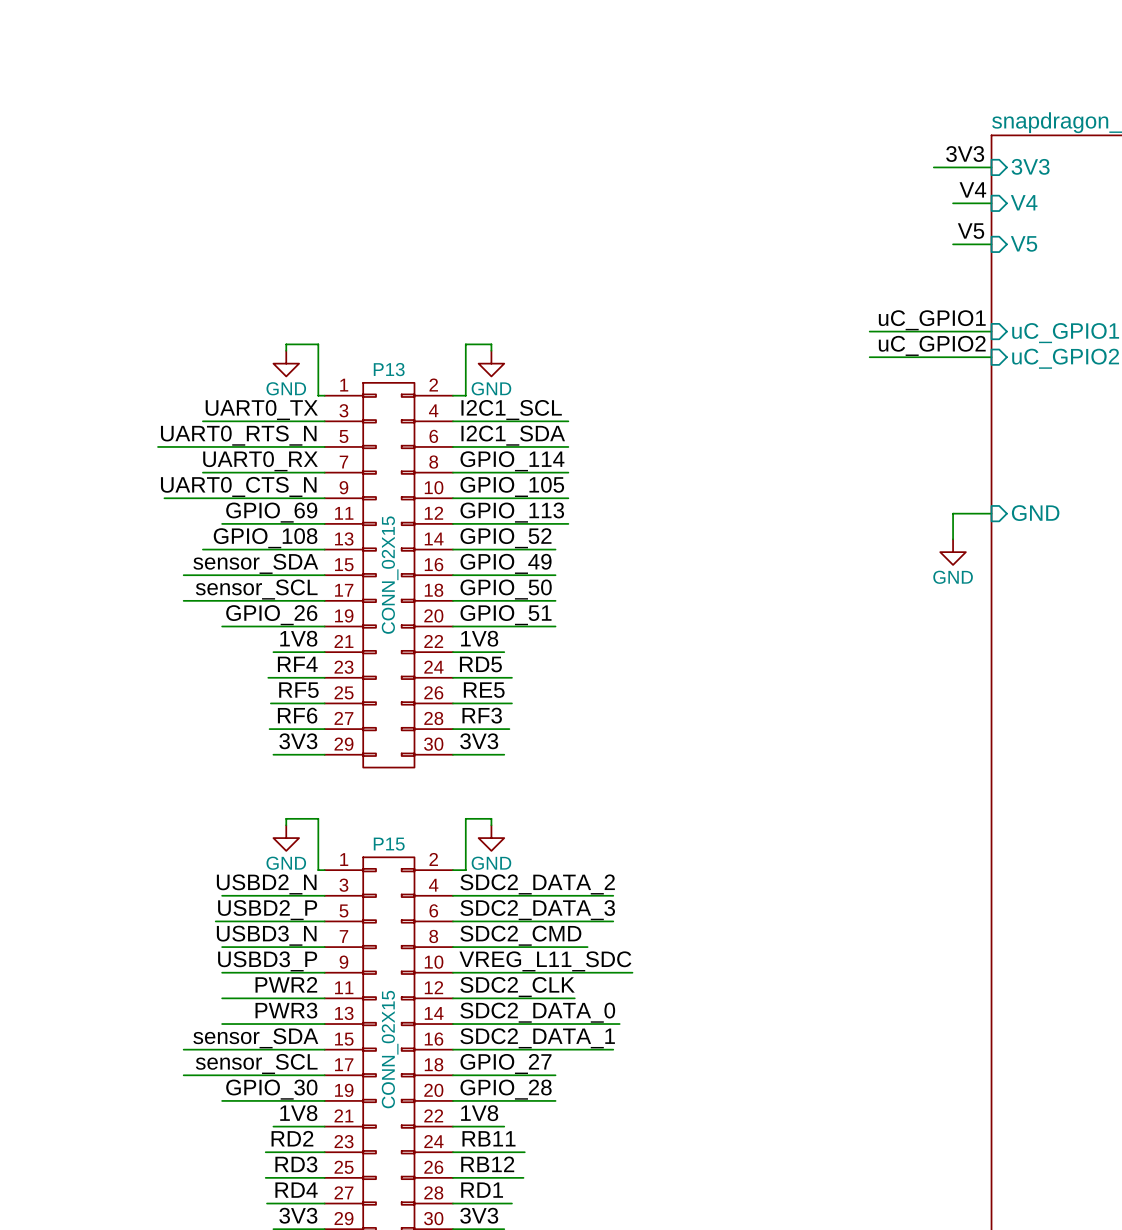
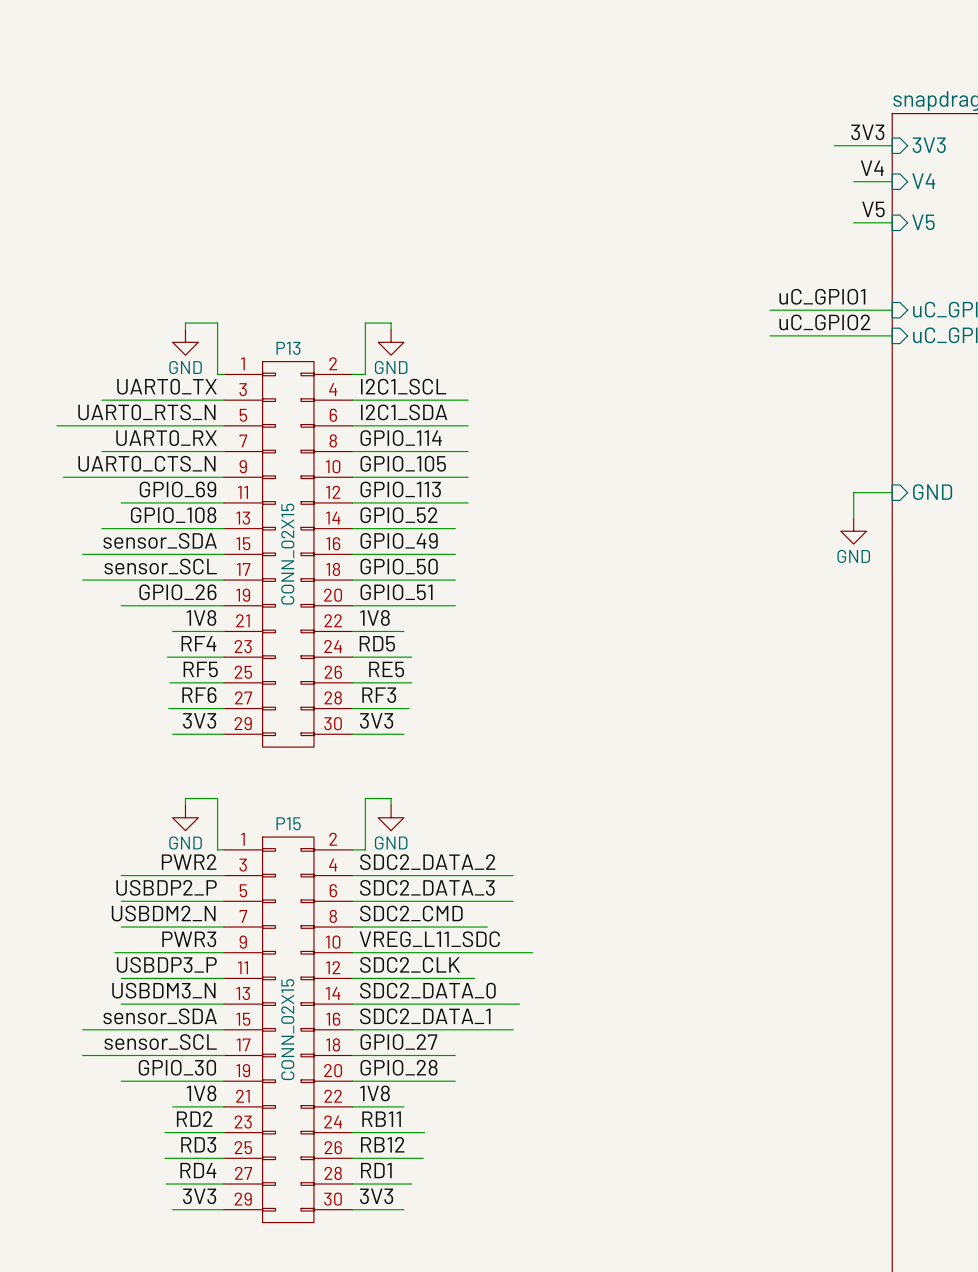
label: USBD2_N (266, 884) -> PWR2 (189, 862)
label: USBD2_P (267, 910) -> USBDP2_P (166, 887)
wire: (215, 921) (222, 921) -> (114, 952) (121, 952)
label: USBD3_N (266, 935) -> USBDM2_N (163, 913)
label: USBD3_P (267, 961) -> PWR3 (189, 939)
label: PWR2 (286, 984) -> USBDP3_P (166, 964)
label: PWR3 (286, 1010) -> USBDM3_N (163, 990)

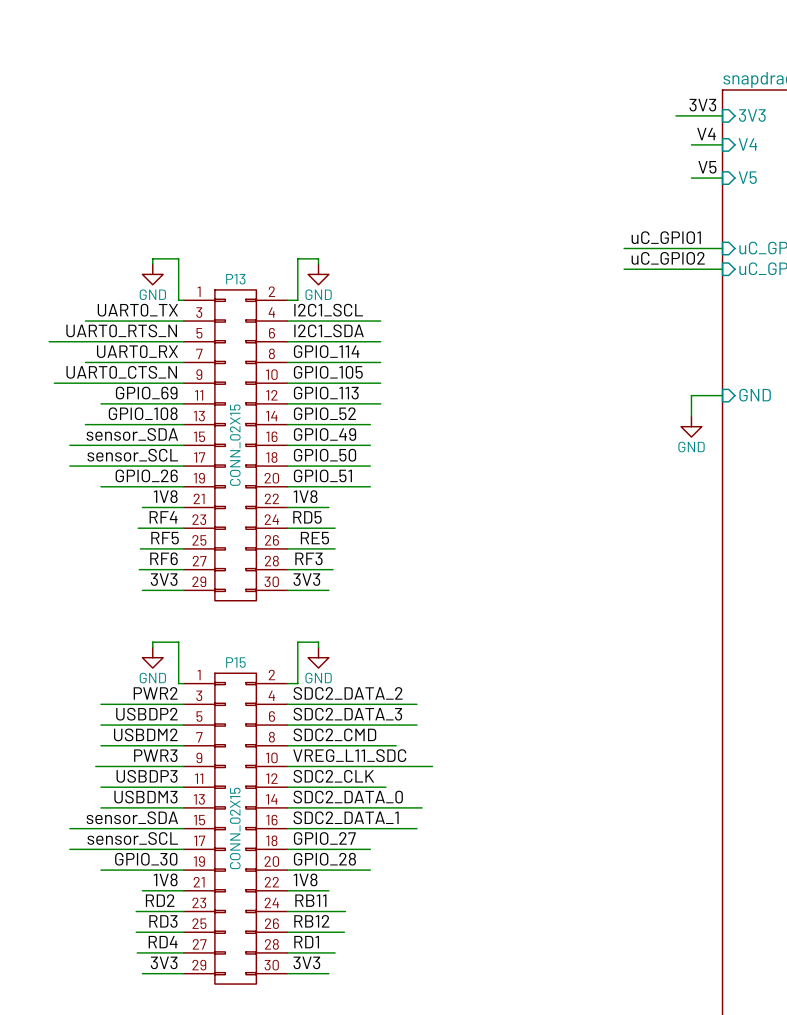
label: USBDP2_P (166, 887) -> USBDP2 (146, 714)
label: USBDM2_N (163, 913) -> USBDM2 (145, 734)
label: USBDP3_P (166, 964) -> USBDP3 (147, 776)
label: USBDM3_N (163, 990) -> USBDM3 (145, 797)

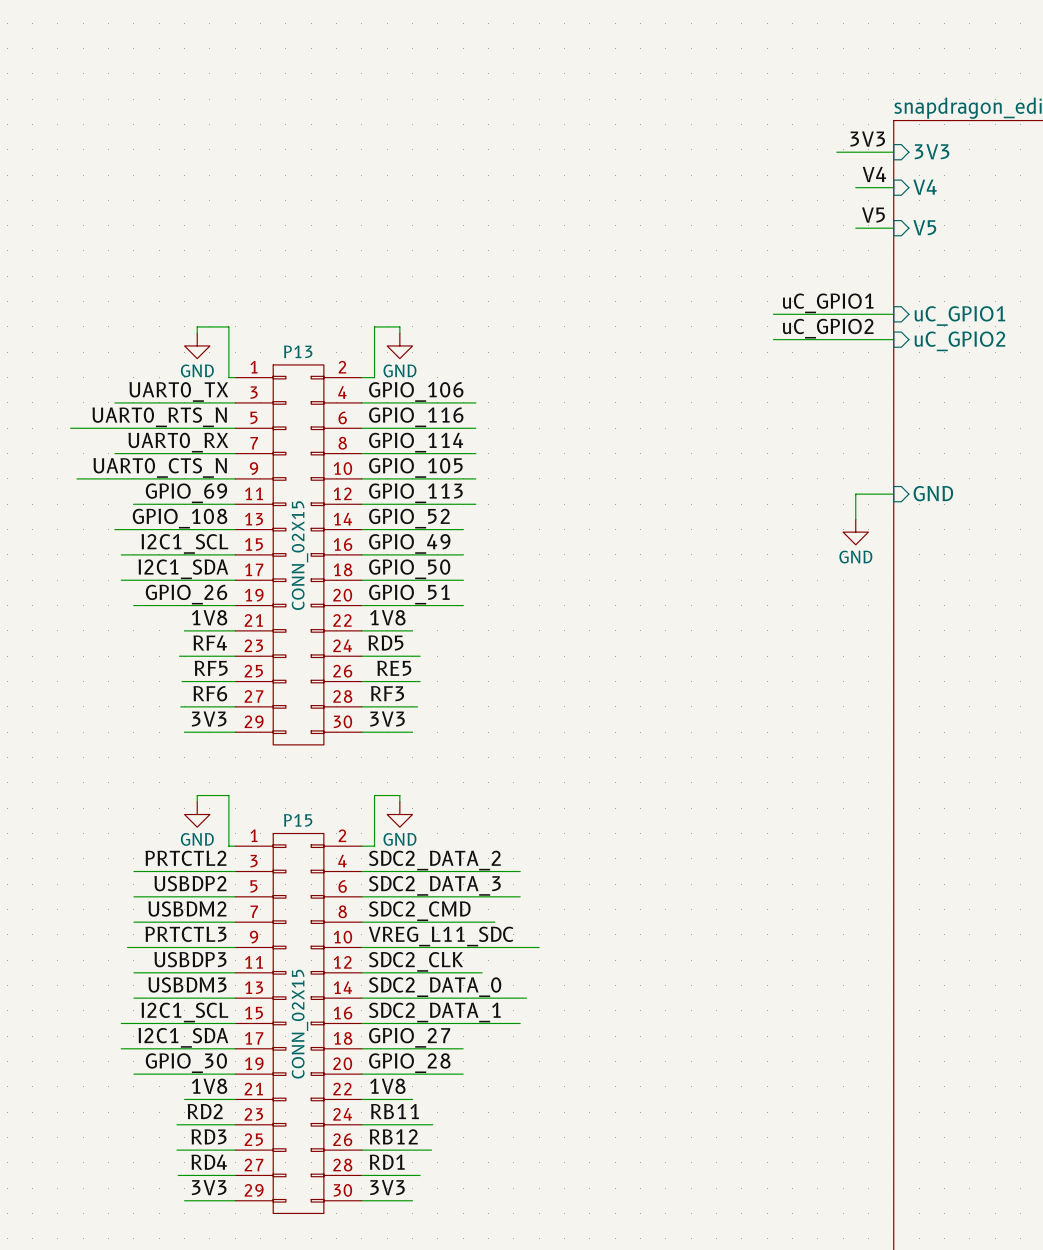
label: I2C1_SCL (328, 310) -> GPIO_106 (416, 391)
label: I2C1_SDA (329, 330) -> GPIO_116 (416, 417)
label: sensor_SDA (132, 434) -> I2C1_SCL (184, 543)
wire: (69, 445) (90, 445) -> none
label: sensor_SCL (132, 455) -> I2C1_SDA (183, 569)
wire: (69, 466) (90, 466) -> none
label: PWR2 (155, 693) -> PRTCTL2 (185, 858)
label: PWR3 (155, 755) -> PRTCTL3 (185, 934)
label: sensor_SDA (132, 817) -> I2C1_SCL (184, 1012)
wire: (69, 828) (90, 828) -> none
label: sensor_SCL (132, 838) -> I2C1_SDA (183, 1037)
wire: (69, 849) (90, 849) -> none

